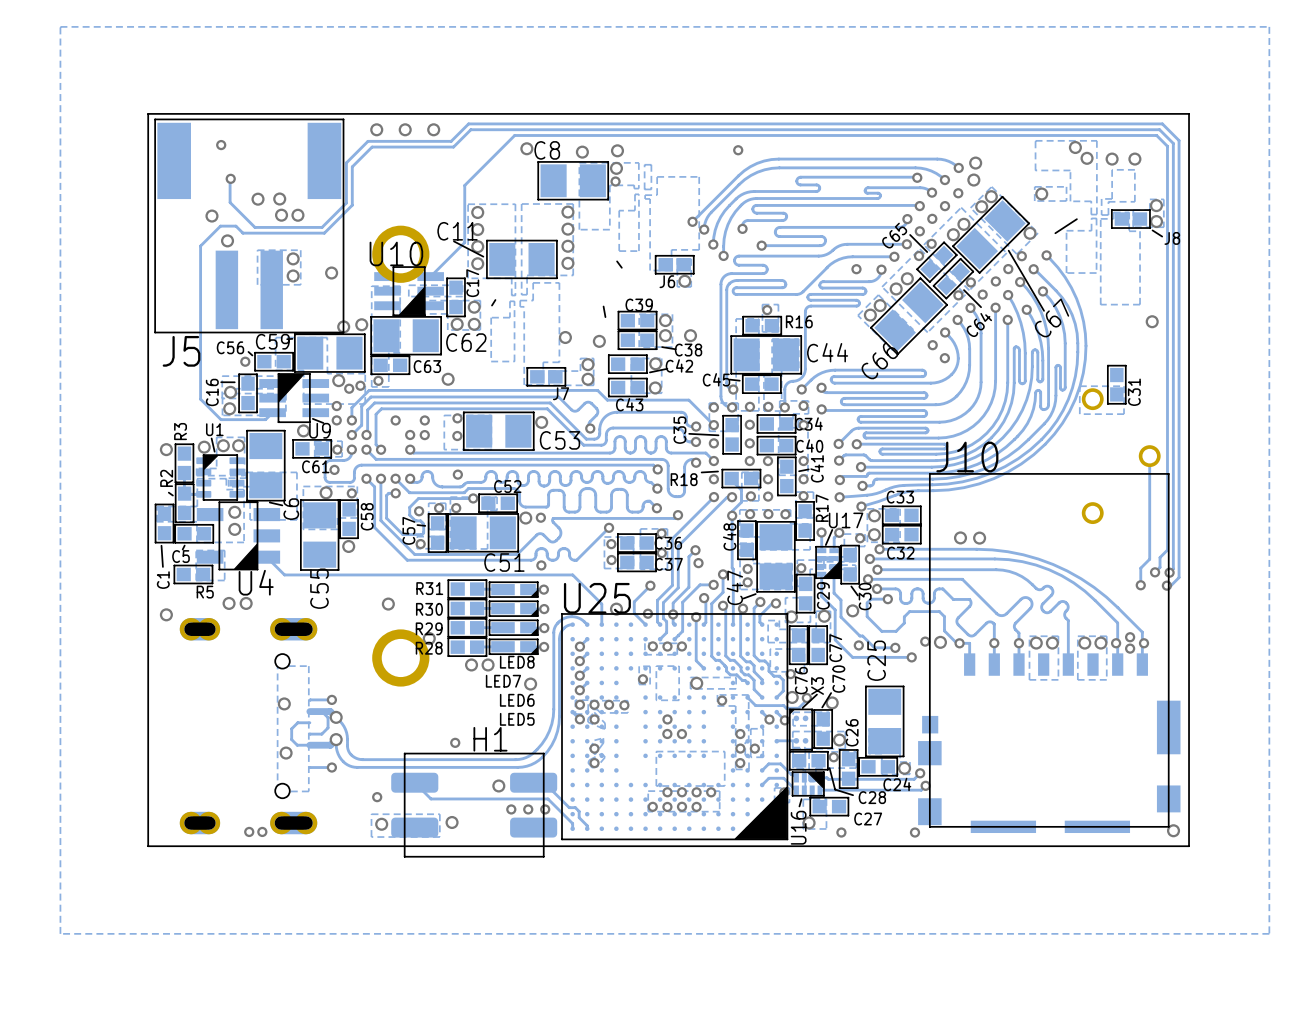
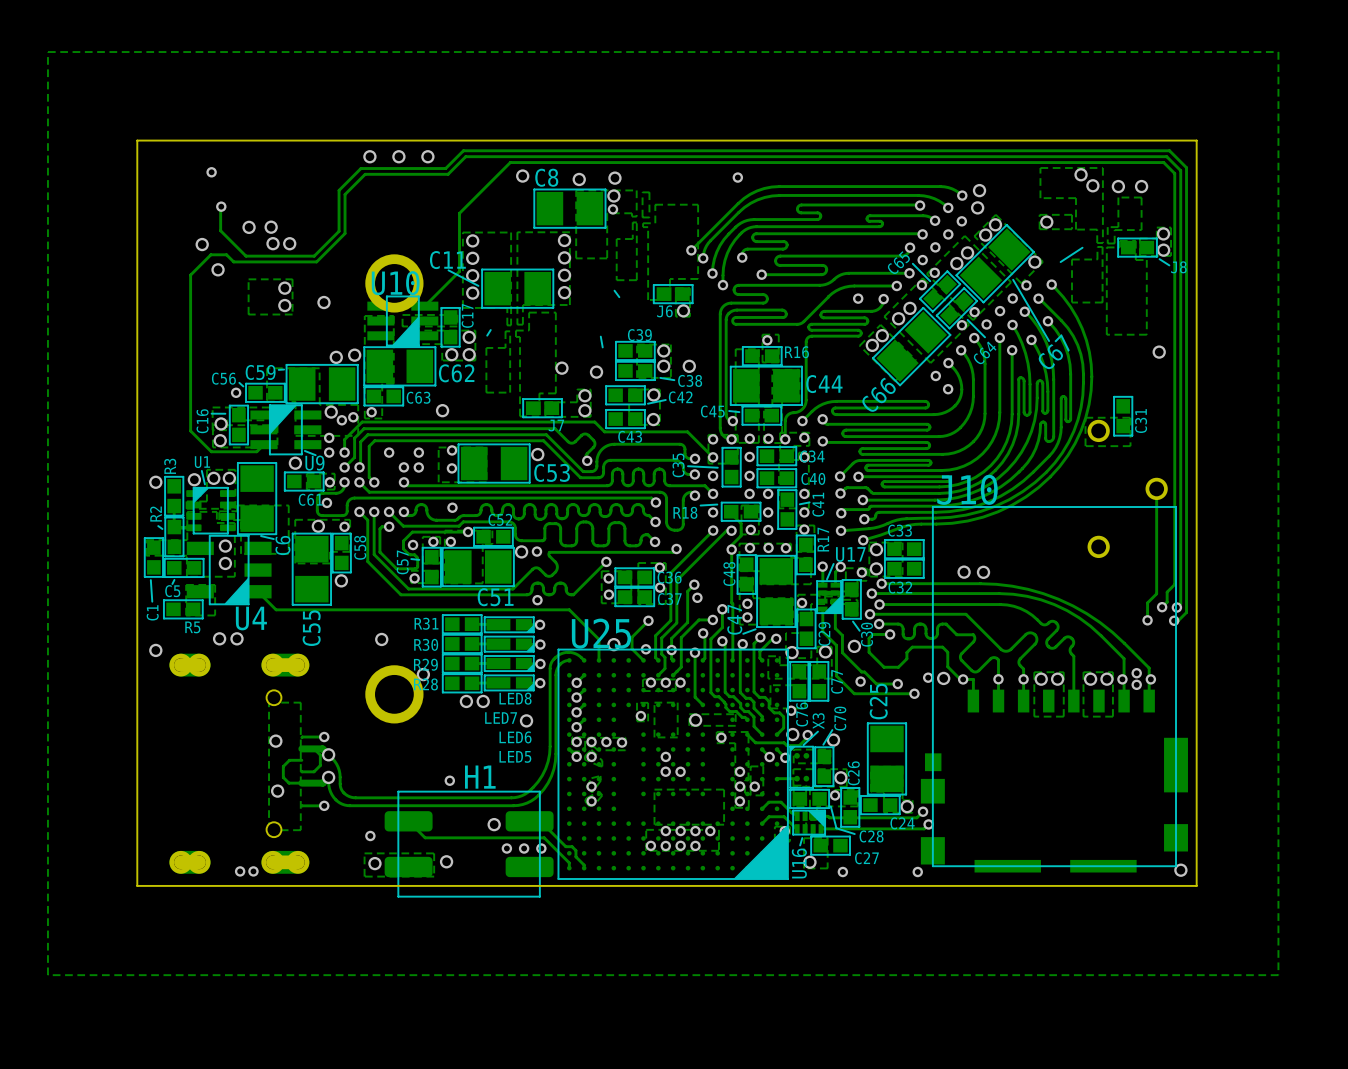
J5: (249, 225) -> none

